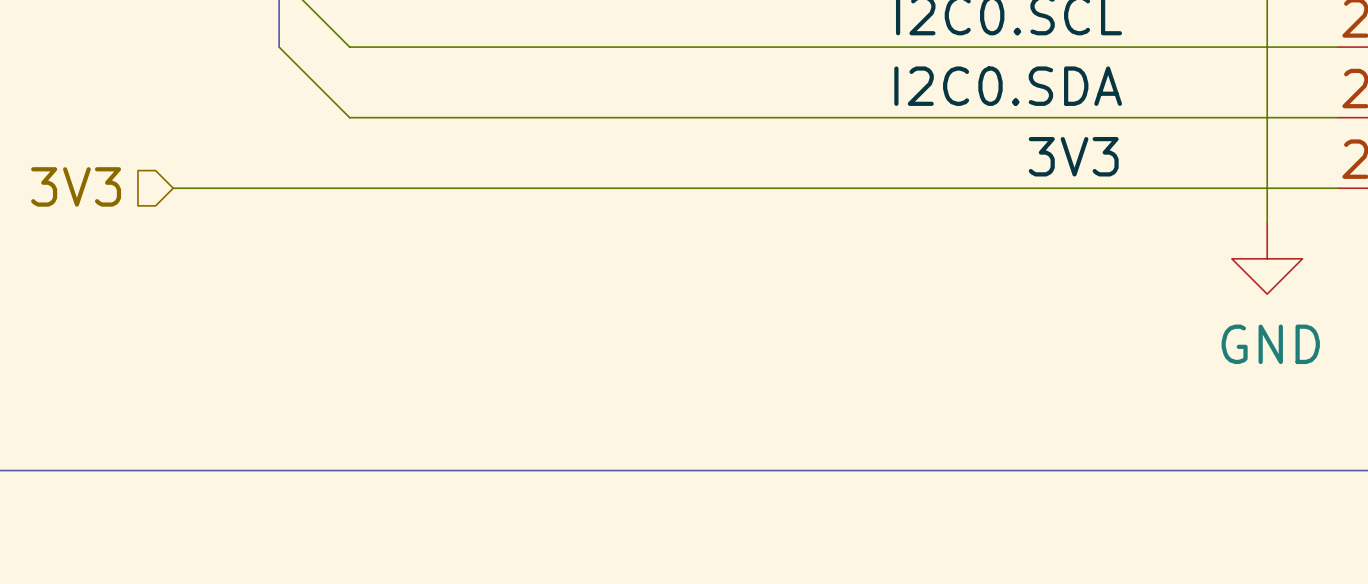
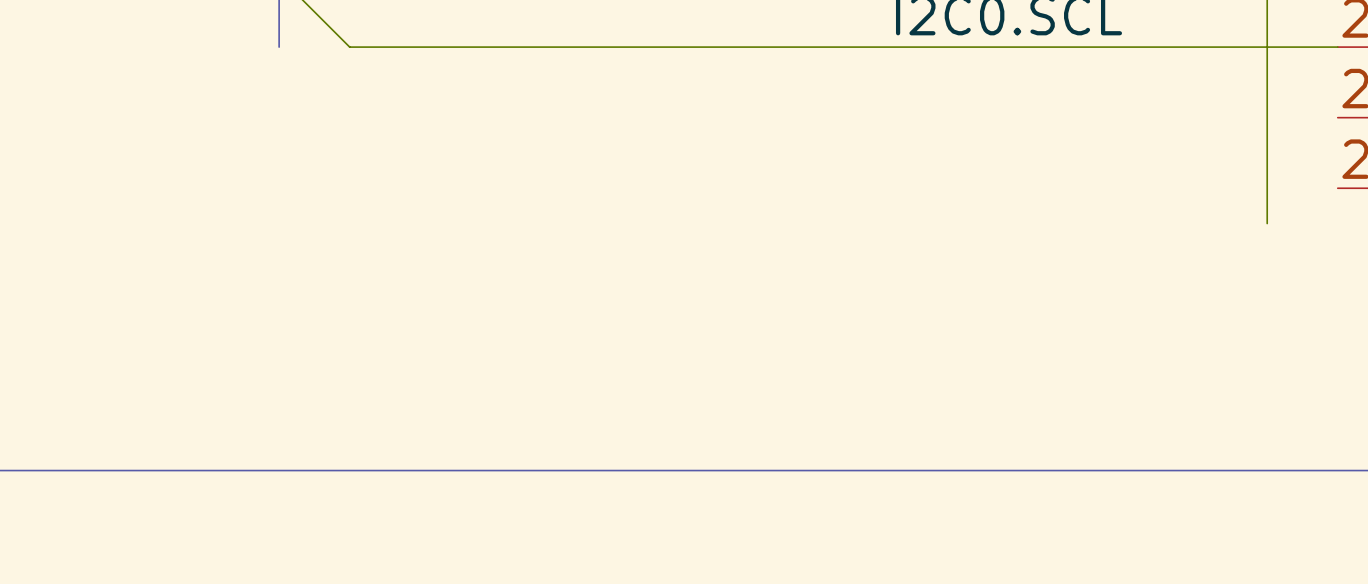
wire: (279, 47) (349, 117) (1337, 117) -> none
label: I2C0.SDA (1008, 86) -> none
label: 3V3 (1073, 156) -> none
hierarchical label: 3V3 (76, 186) -> none
wire: (173, 188) (1337, 188) -> none
power symbol: GND (1267, 258) -> none

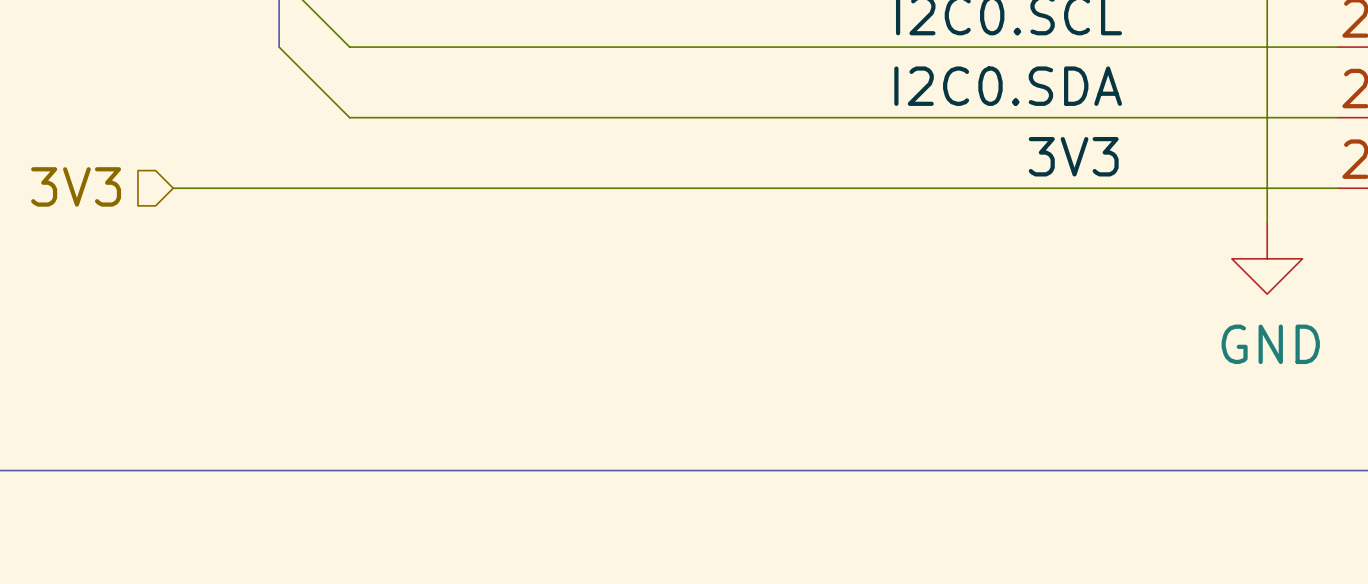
wire: none -> (279, 47) (349, 117) (1337, 117)
label: none -> I2C0.SDA (1008, 86)
label: none -> 3V3 (1073, 156)
hierarchical label: none -> 3V3 (76, 186)
wire: none -> (173, 188) (1337, 188)
power symbol: none -> GND (1267, 258)

